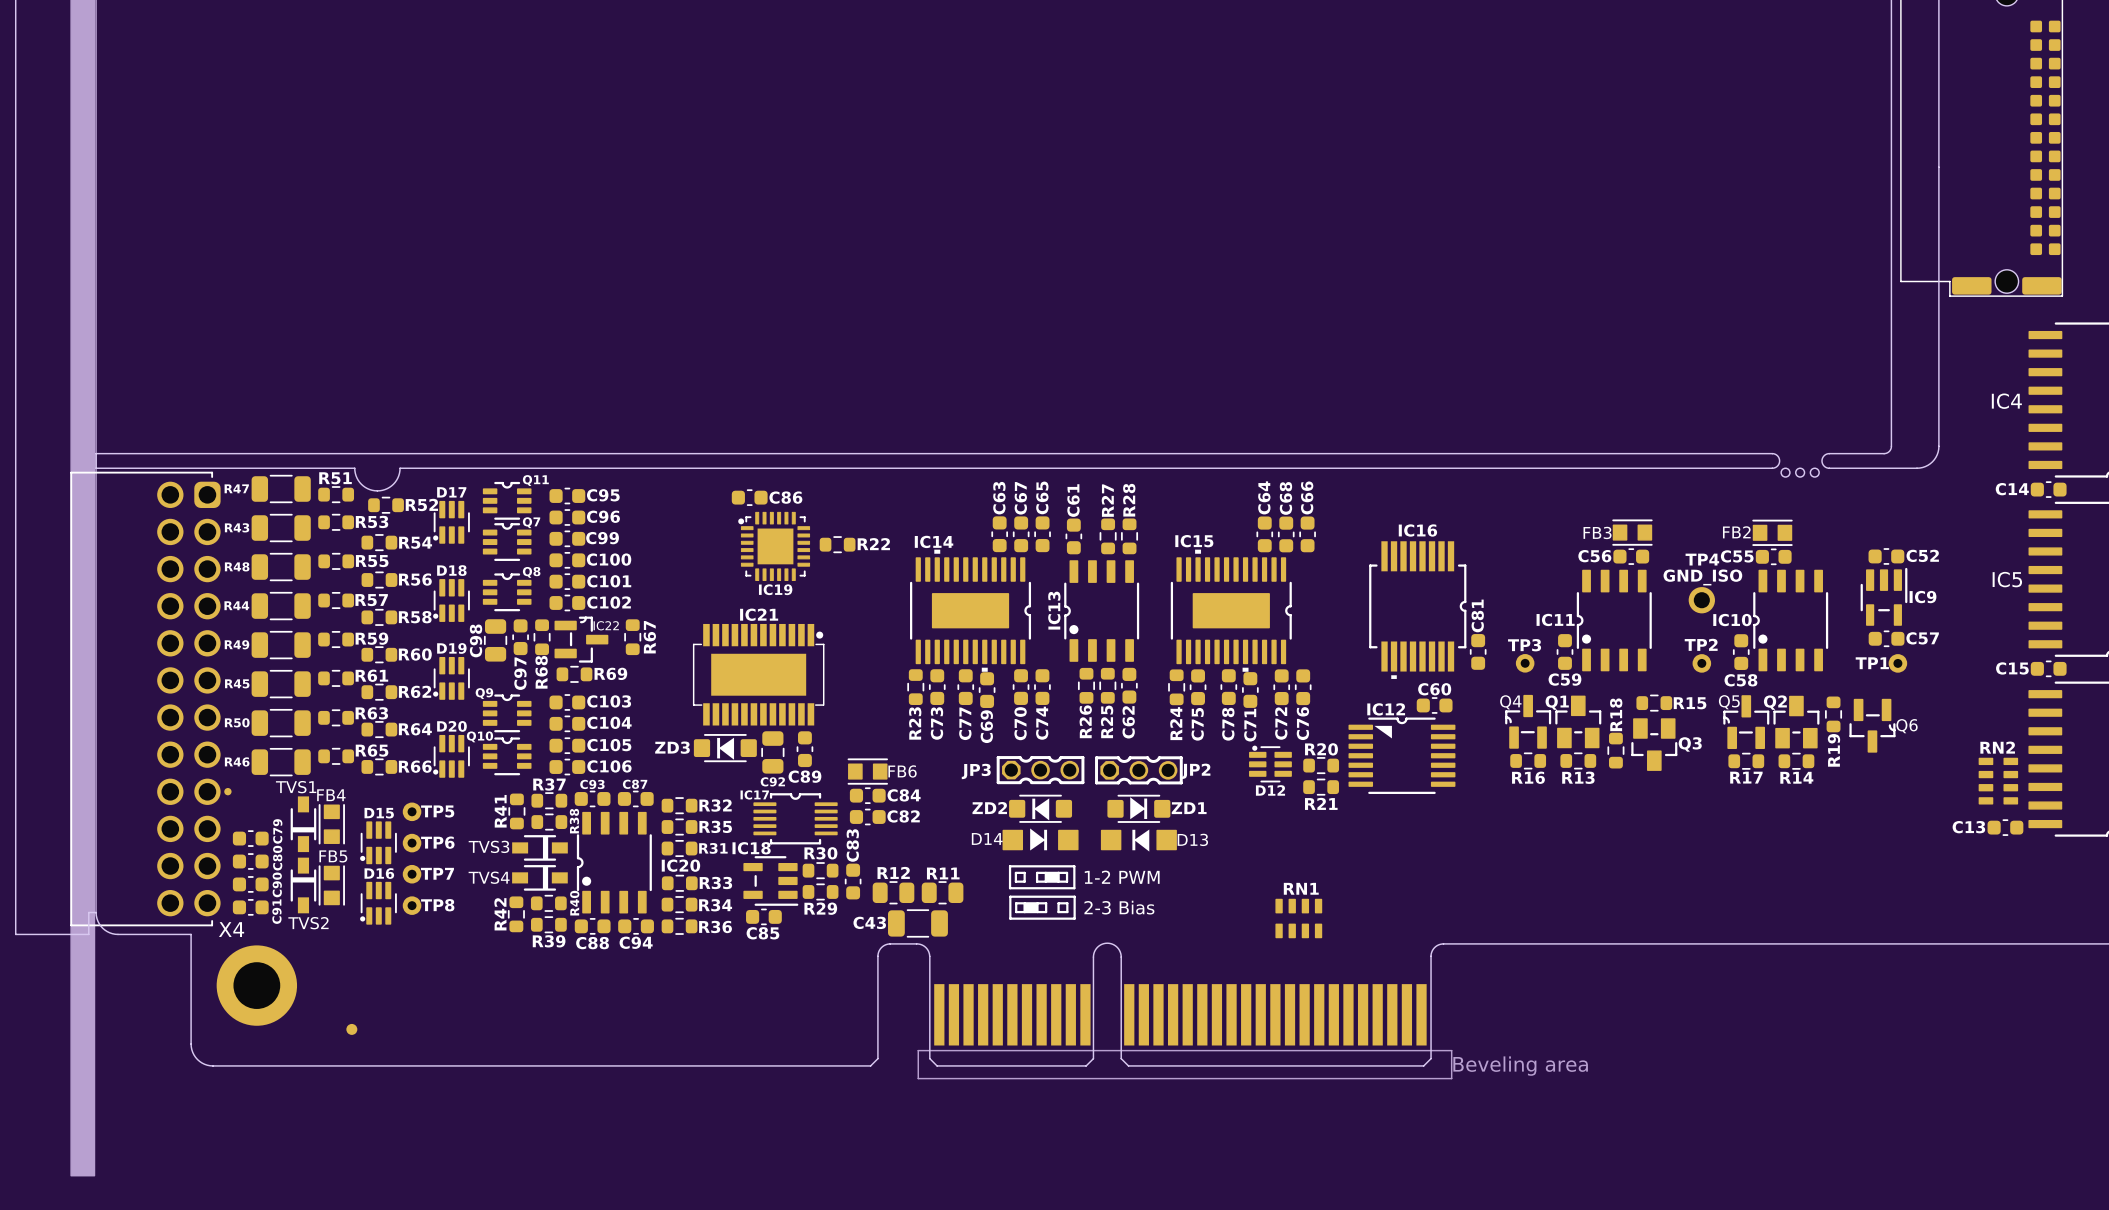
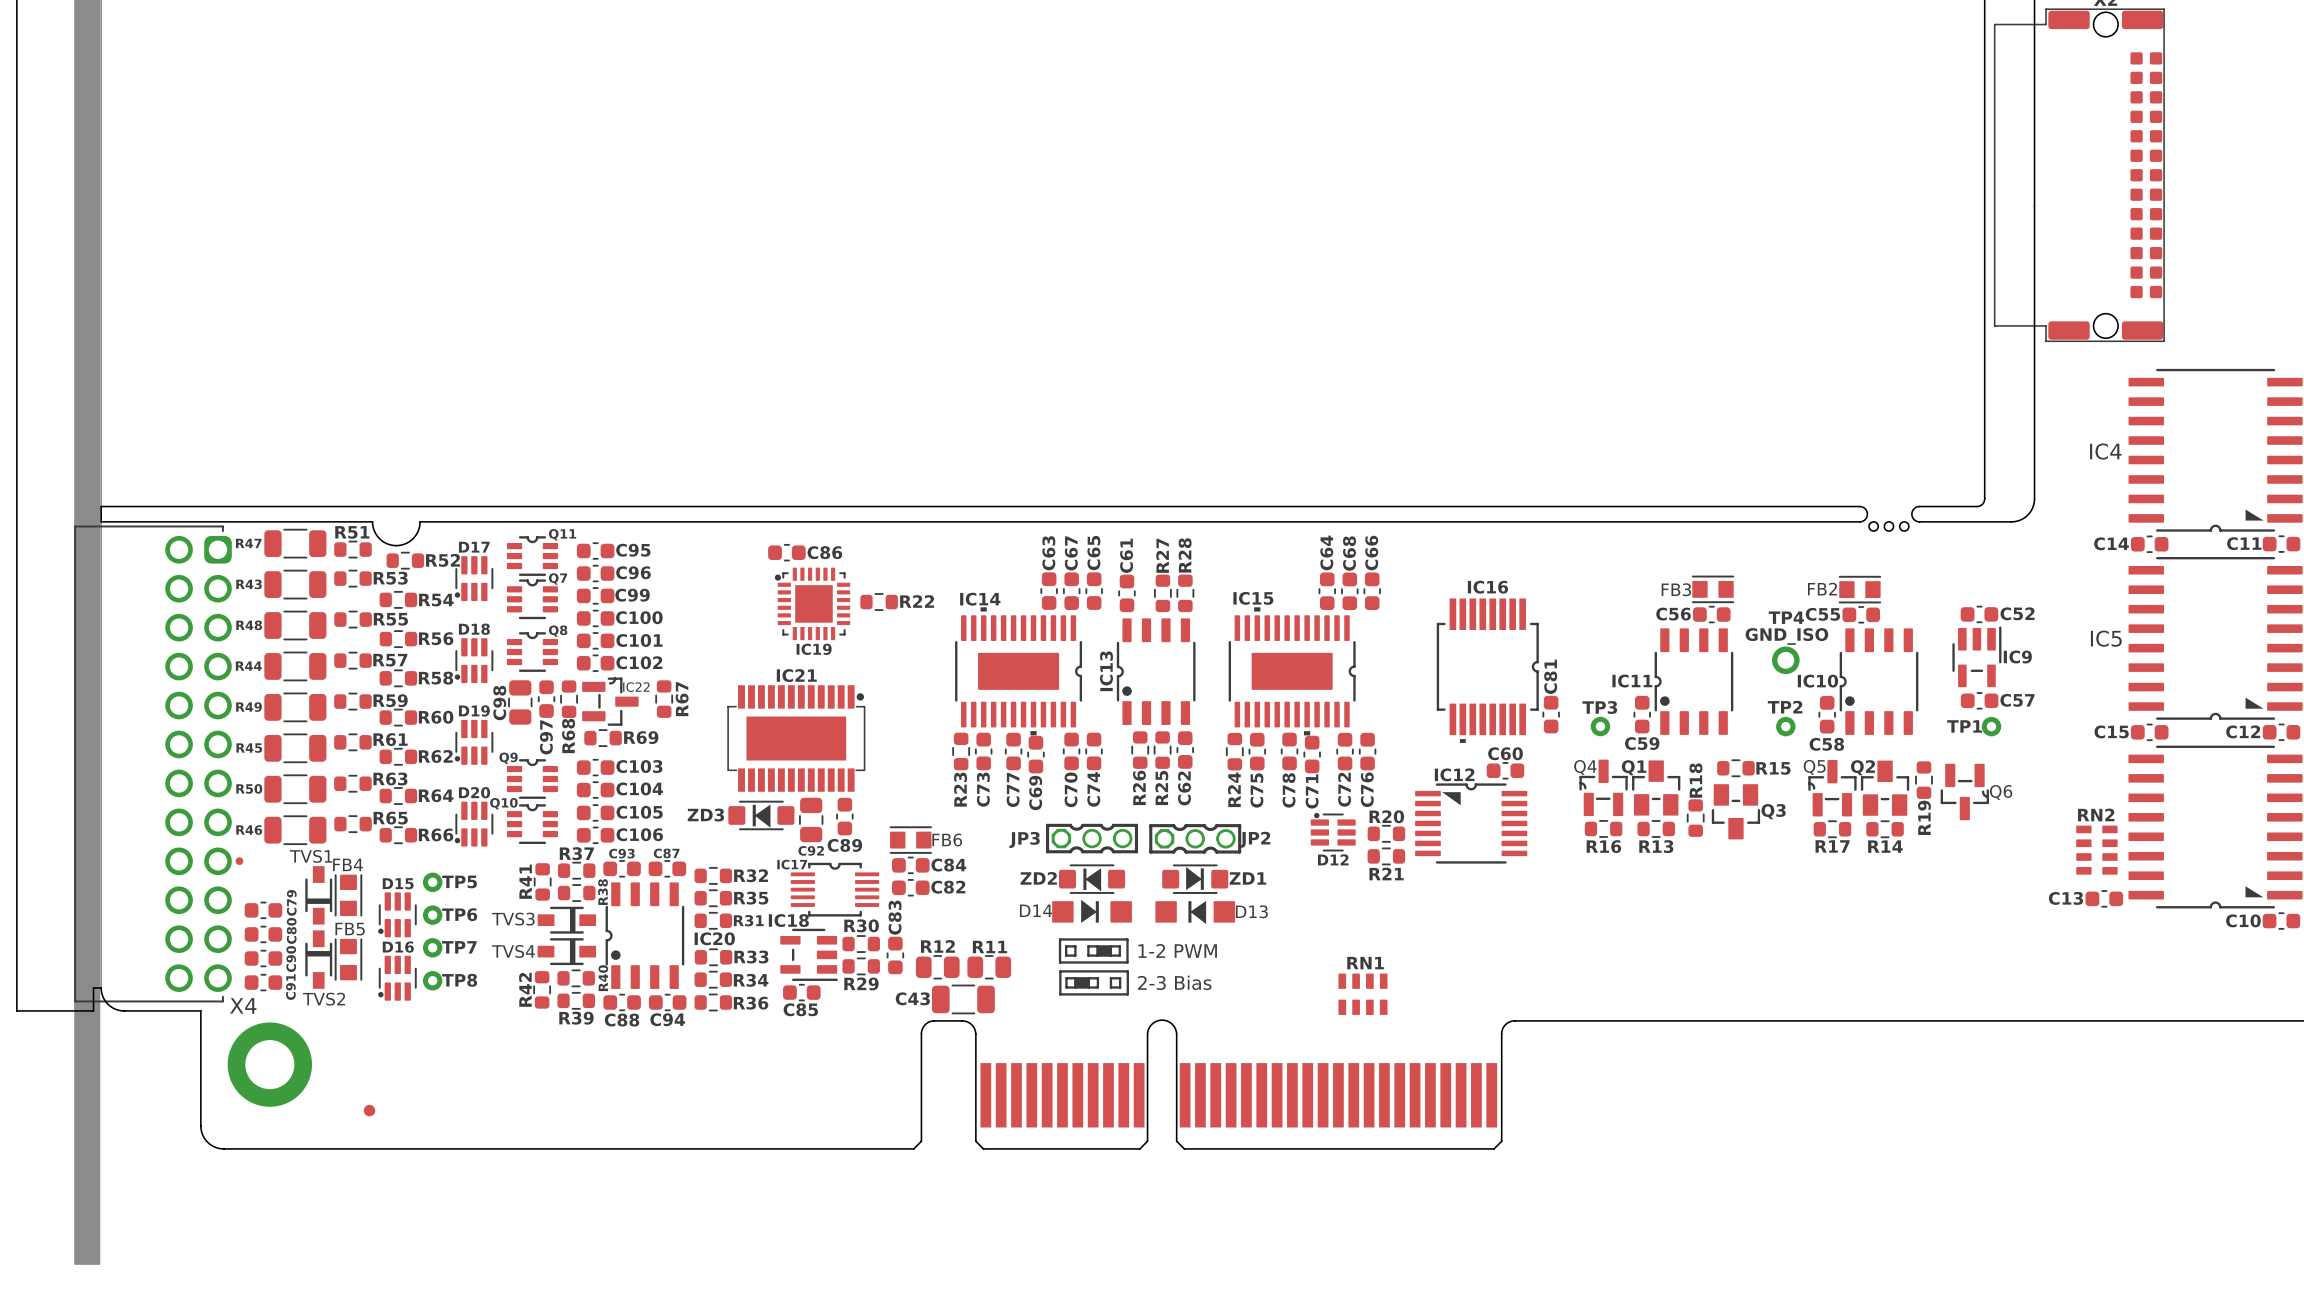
line: (918, 1050) (1451, 1050) (1451, 1078) (918, 1078) (918, 1050) -> none
text: Beveling area (1520, 1066) -> none

